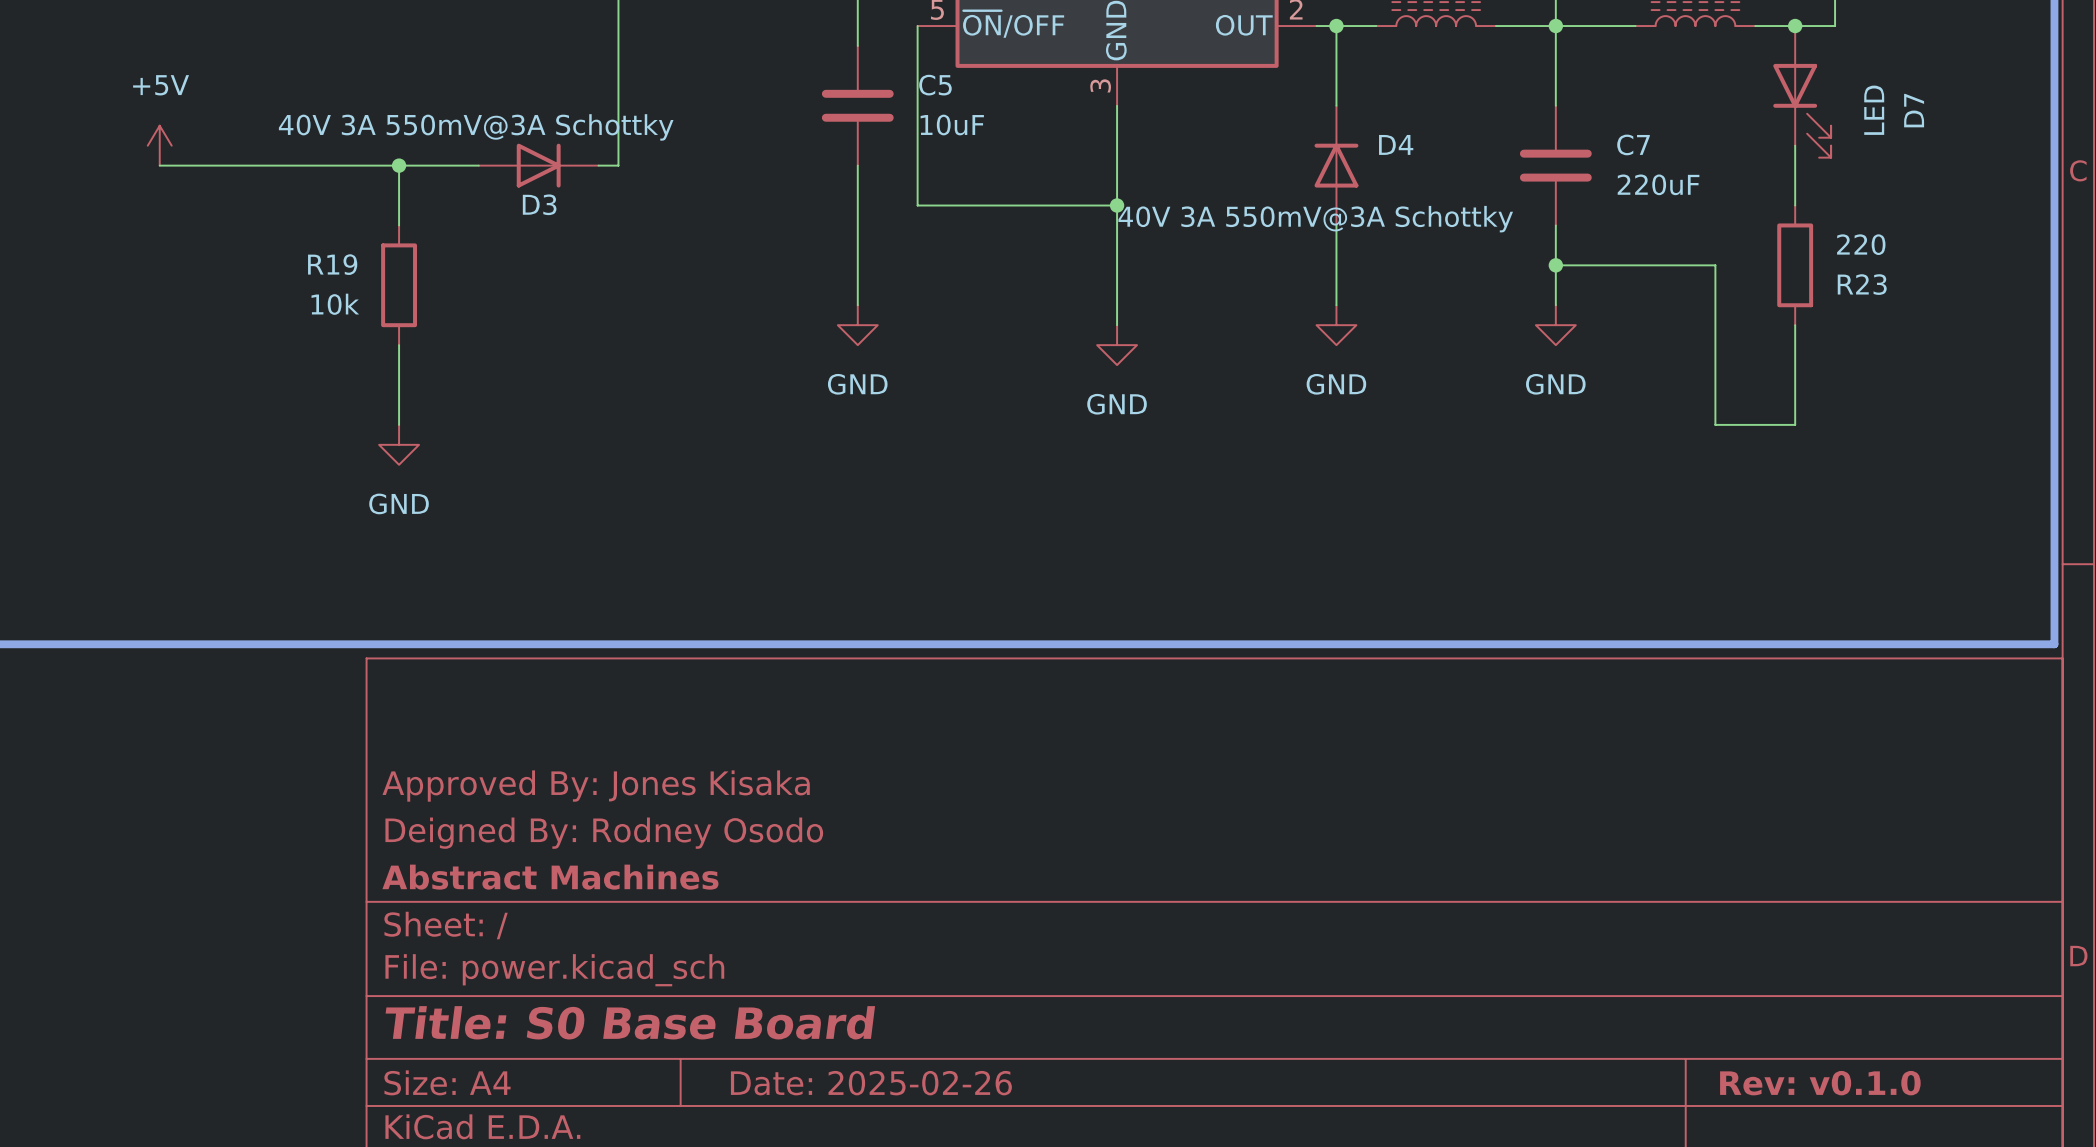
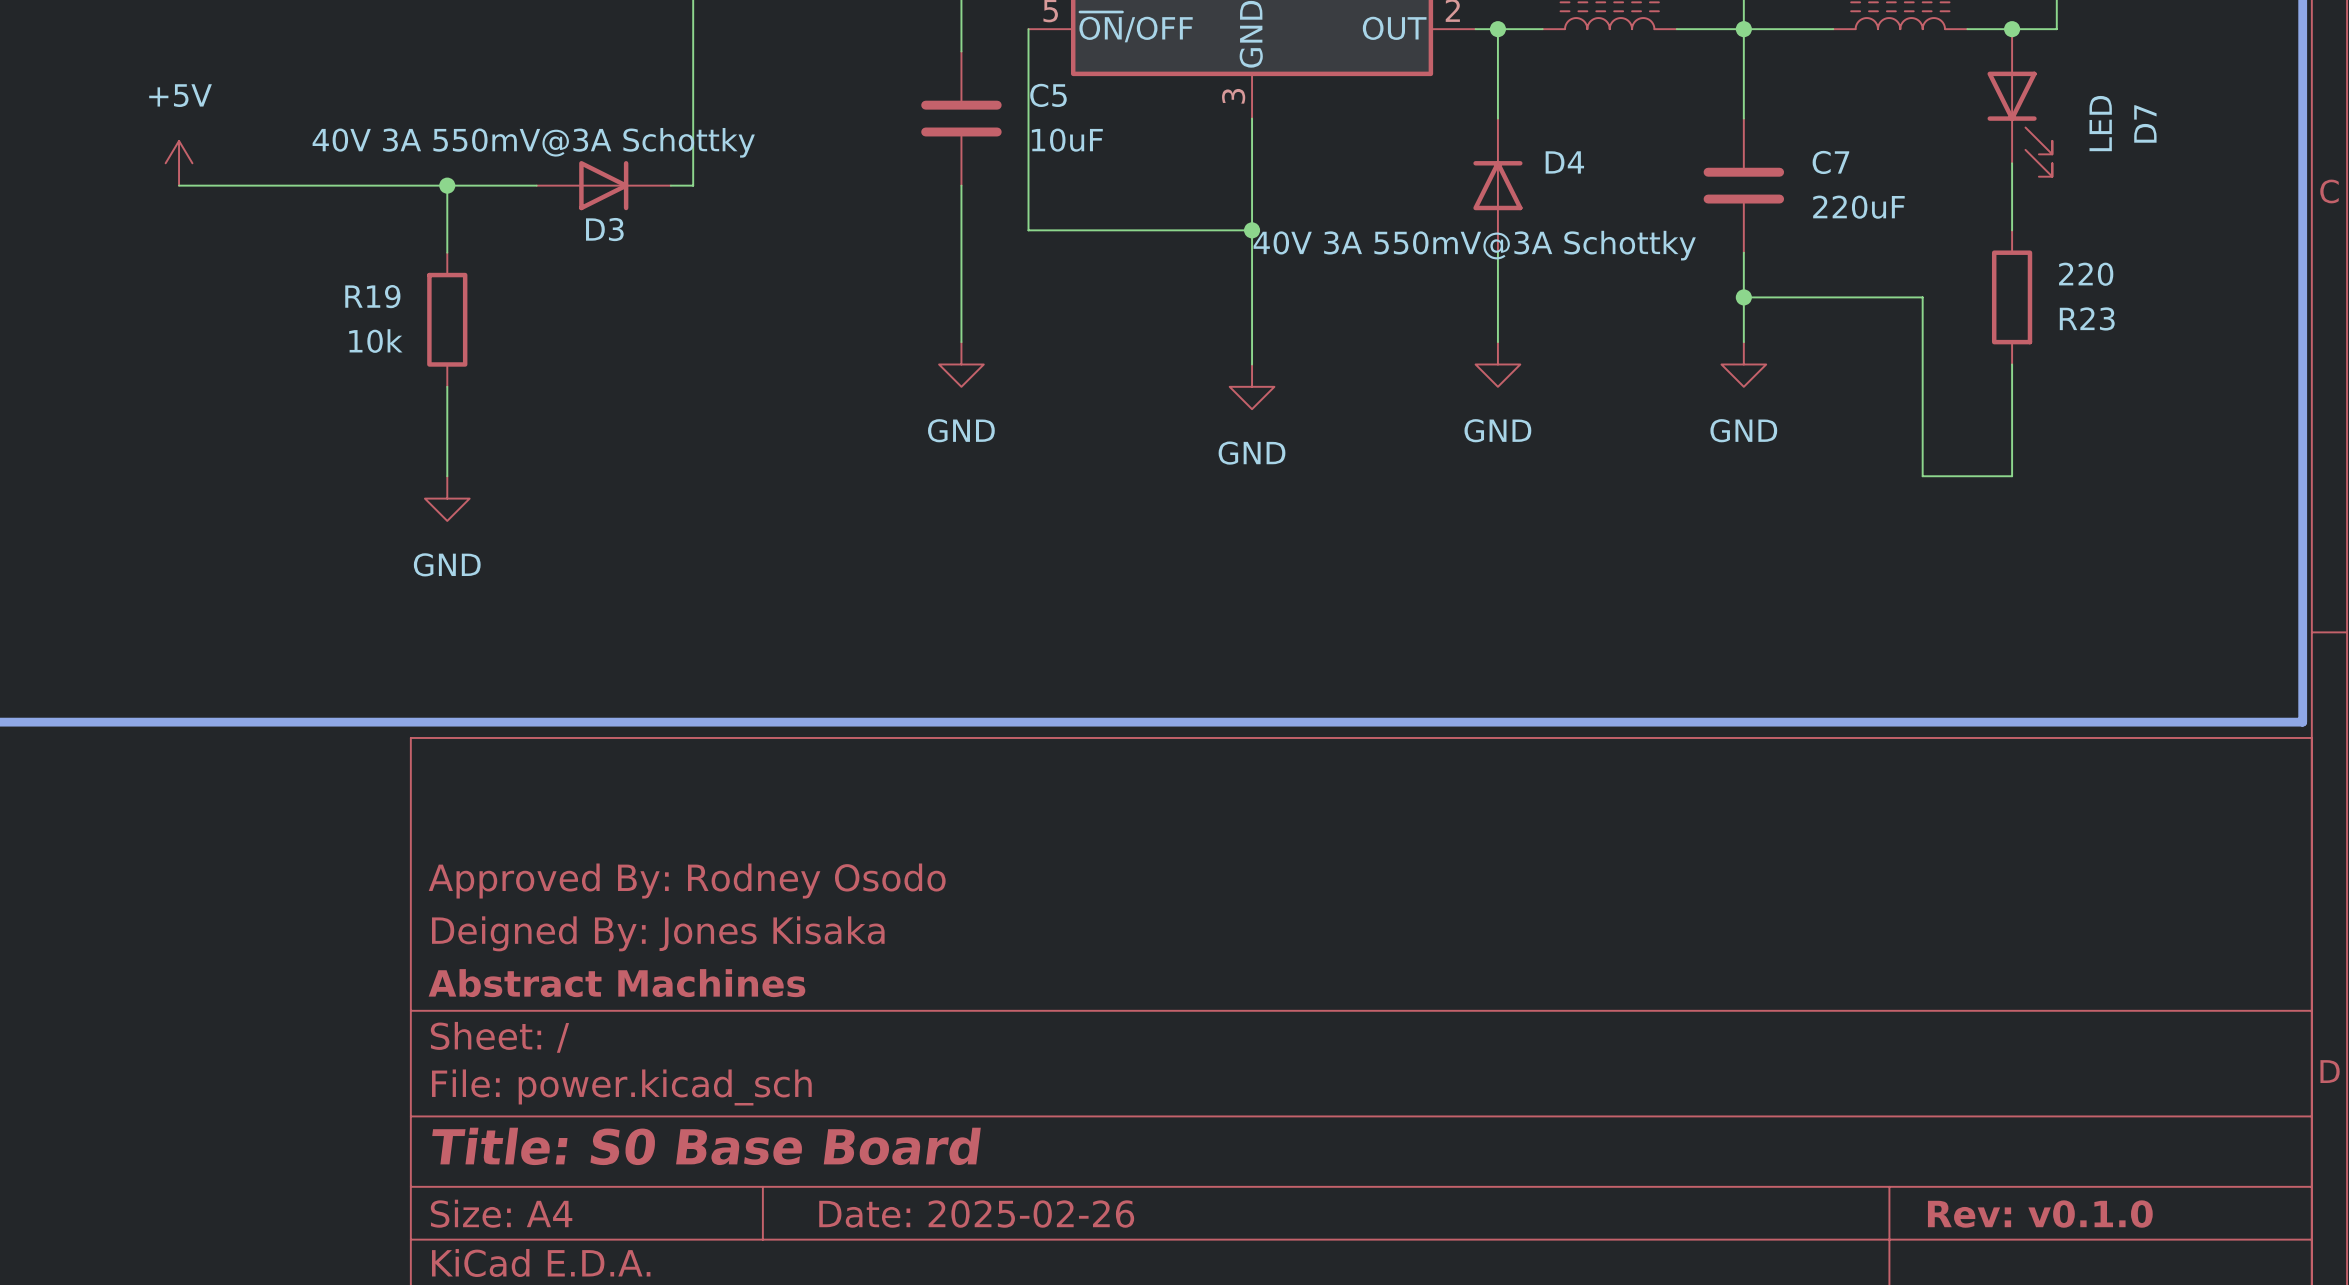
title block: Approved By: Jones Kisaka (596, 786) -> Approved By: Rodney Osodo (687, 881)
title block: Deigned By: Rodney Osodo (604, 833) -> Deigned By: Jones Kisaka (658, 933)

